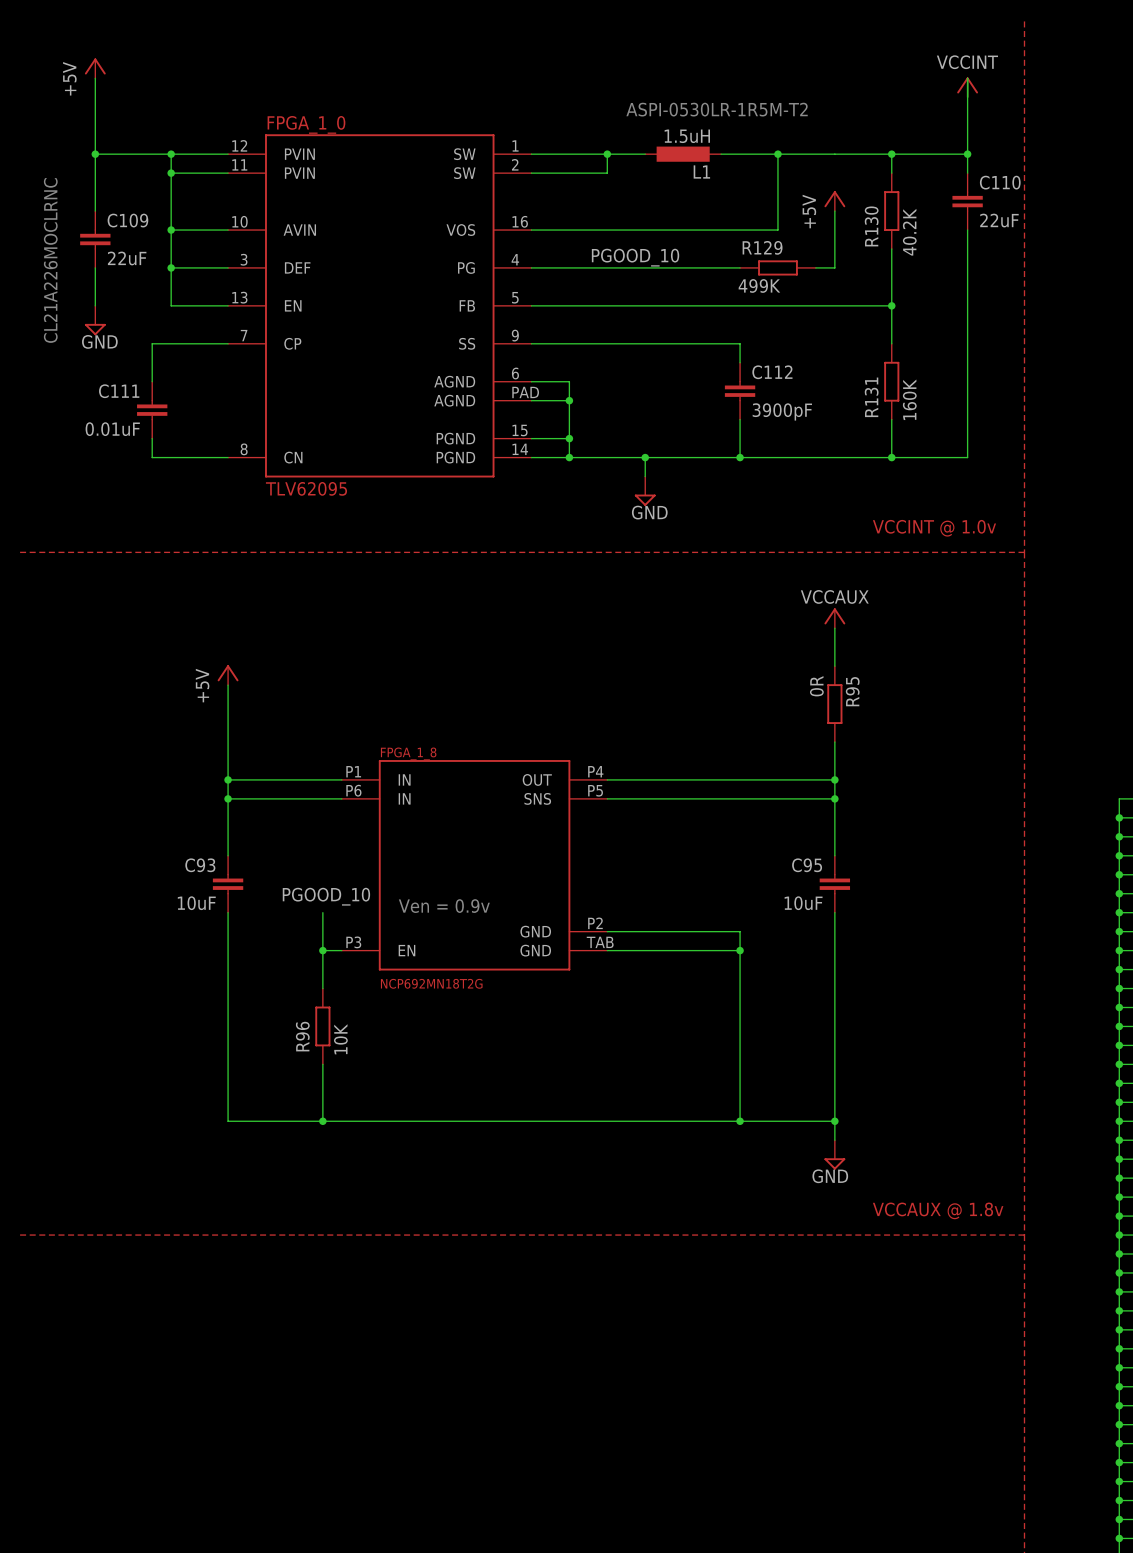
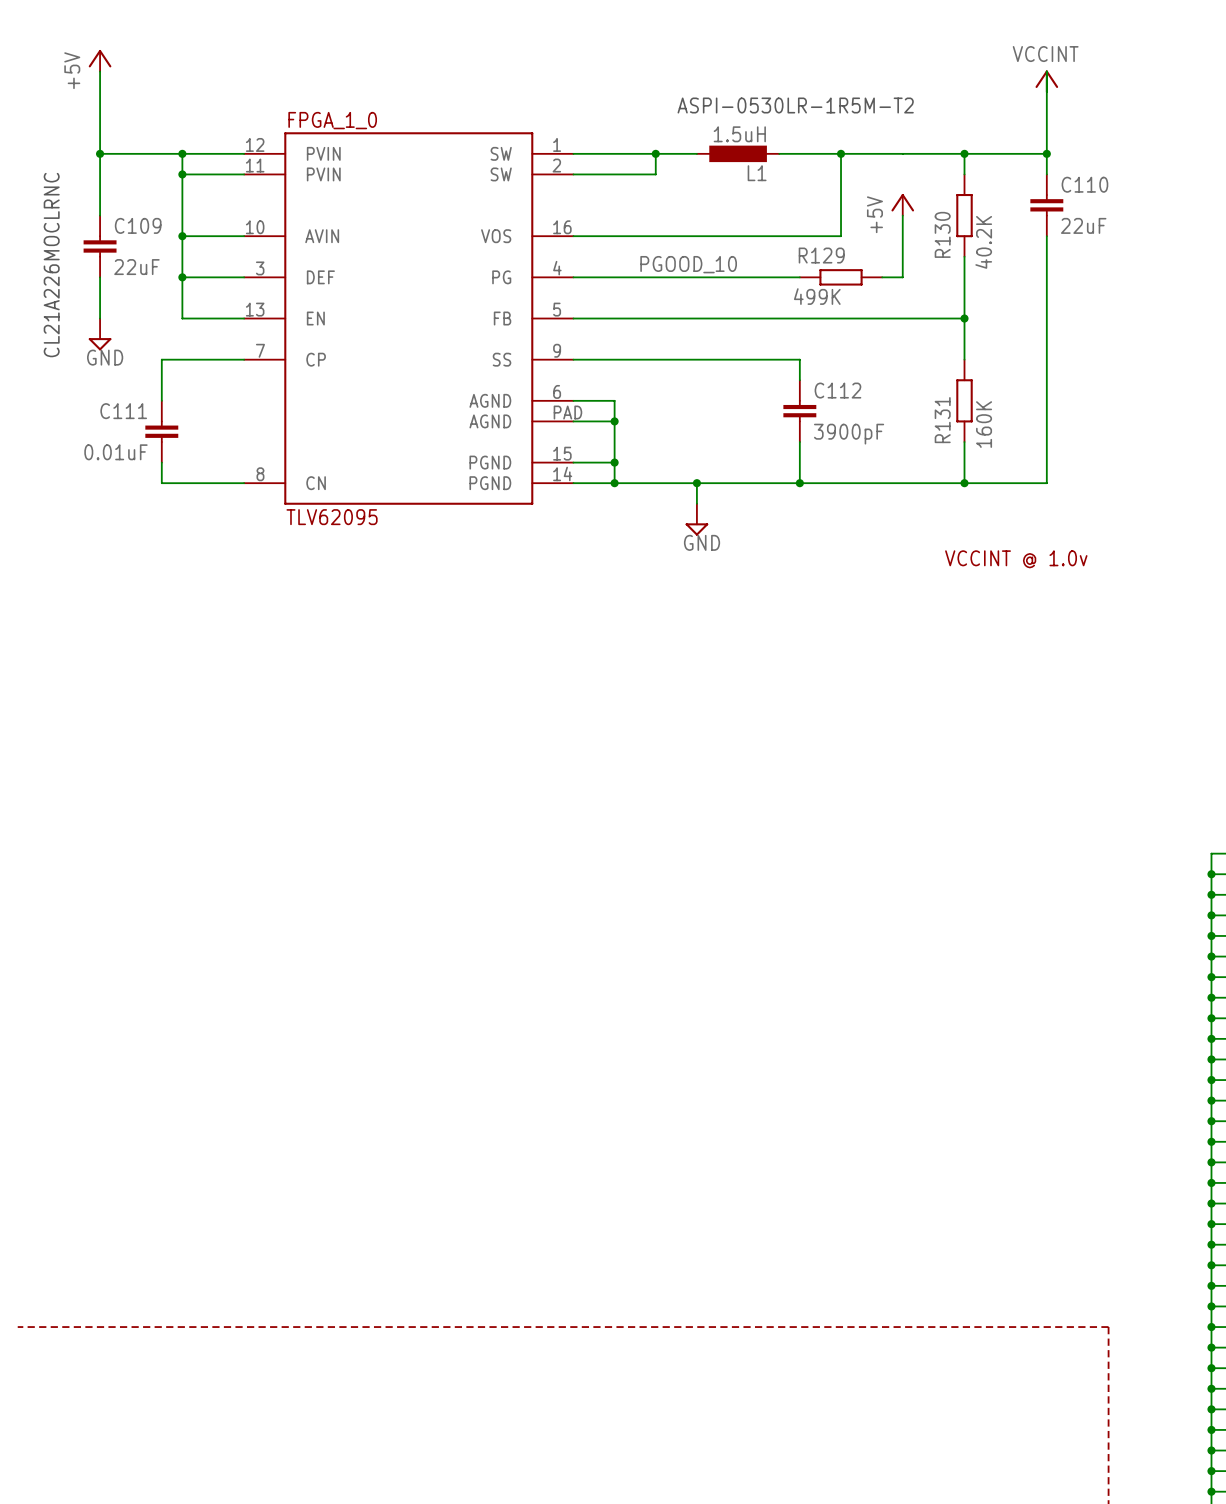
line: (1024, 21) (1024, 1235) -> none
line: (19, 552) (1024, 552) -> none
power symbol: VCCAUX (834, 618) -> none
wire: (834, 628) (834, 666) -> none
power symbol: +5V (228, 675) -> none
wire: (228, 685) (228, 855) -> none
R95: 0R (834, 704) -> none
wire: (834, 742) (834, 855) -> none
wire: (228, 779) (341, 779) -> none
junction: (228, 779) -> none
wire: (607, 779) (834, 779) -> none
junction: (834, 779) -> none
wire: (228, 798) (341, 798) -> none
junction: (228, 798) -> none
wire: (607, 798) (834, 798) -> none
junction: (834, 798) -> none
FPGA_1_8: NCP692MN18T2G (474, 865) -> none
C93: 10uF (228, 884) -> none
C95: 10uF (834, 884) -> none
label: PGOOD_10 (326, 896) -> none
text: Ven = 0.9v (444, 906) -> none
wire: (228, 912) (228, 1121) (834, 1121) -> none
wire: (322, 912) (322, 988) -> none
wire: (834, 912) (834, 1140) -> none
wire: (607, 931) (740, 931) (740, 1121) -> none
wire: (322, 950) (341, 950) -> none
junction: (322, 950) -> none
wire: (607, 950) (740, 950) -> none
junction: (740, 950) -> none
R96: 10K (322, 1026) -> none
wire: (322, 1064) (322, 1121) -> none
junction: (322, 1121) -> none
junction: (740, 1121) -> none
junction: (834, 1121) -> none
power symbol: GND (834, 1154) -> none
text: VCCAUX @ 1.8v (938, 1210) -> none

